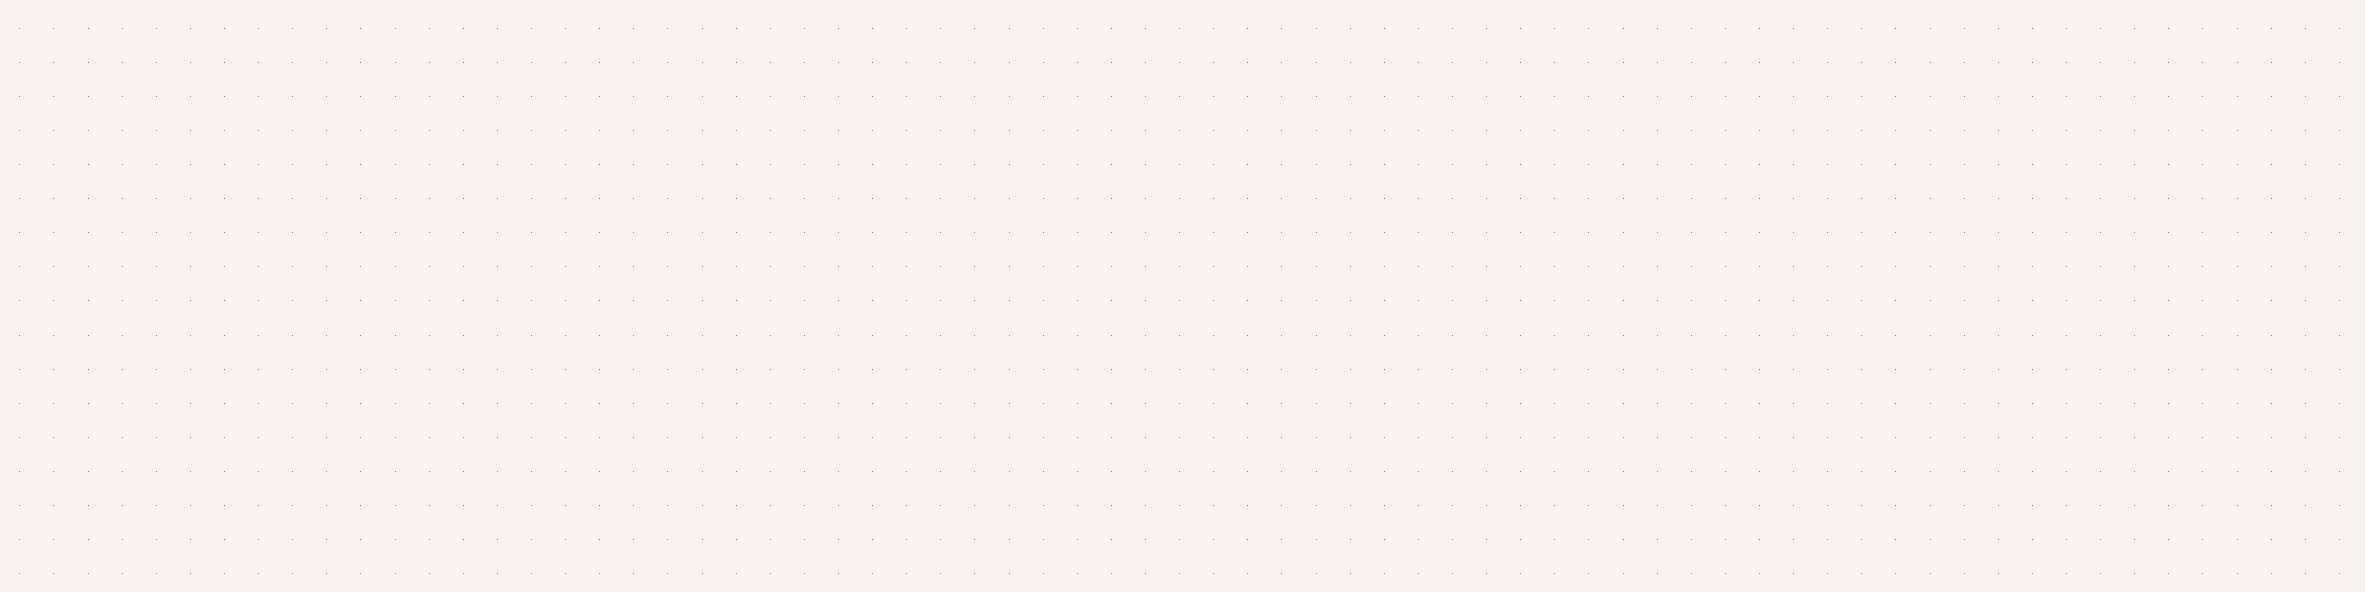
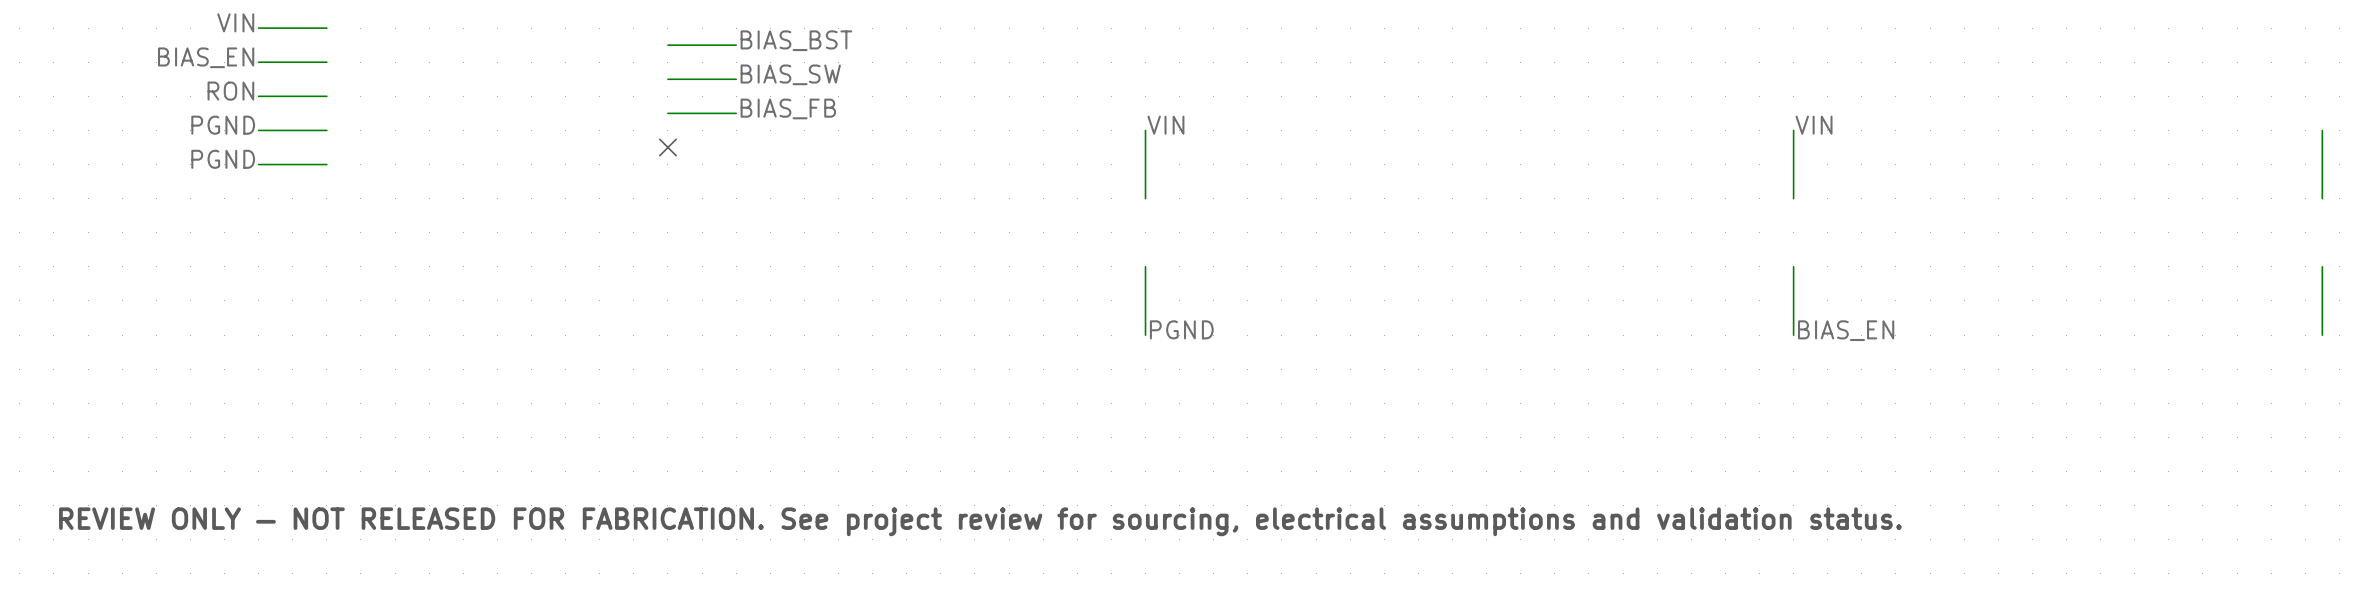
label: none -> VIN (235, 22)
wire: none -> (258, 28) (326, 28)
label: none -> BIAS_BST (796, 40)
wire: none -> (667, 45) (736, 45)
label: none -> BIAS_EN (206, 57)
wire: none -> (258, 62) (326, 62)
label: none -> BIAS_SW (790, 74)
wire: none -> (667, 79) (736, 79)
label: none -> RON (230, 91)
wire: none -> (258, 96) (326, 96)
label: none -> BIAS_FB (788, 108)
wire: none -> (667, 113) (736, 113)
label: none -> PGND (223, 125)
label: none -> VIN (1165, 125)
label: none -> VIN (1814, 125)
wire: none -> (258, 130) (326, 130)
wire: none -> (1145, 130) (1145, 198)
wire: none -> (1793, 130) (1793, 198)
wire: none -> (2322, 130) (2322, 198)
no-connect mark: none -> (667, 147)
label: none -> PGND (223, 159)
wire: none -> (258, 164) (326, 164)
wire: none -> (1145, 266) (1145, 335)
wire: none -> (1793, 266) (1793, 335)
wire: none -> (2322, 266) (2322, 335)
label: none -> PGND (1181, 329)
label: none -> BIAS_EN (1846, 330)
text: none -> REVIEW ONLY — NOT RELEASED FOR FABRICATION. See project review for sourcing, electrical assumptions and validation status. (980, 521)

